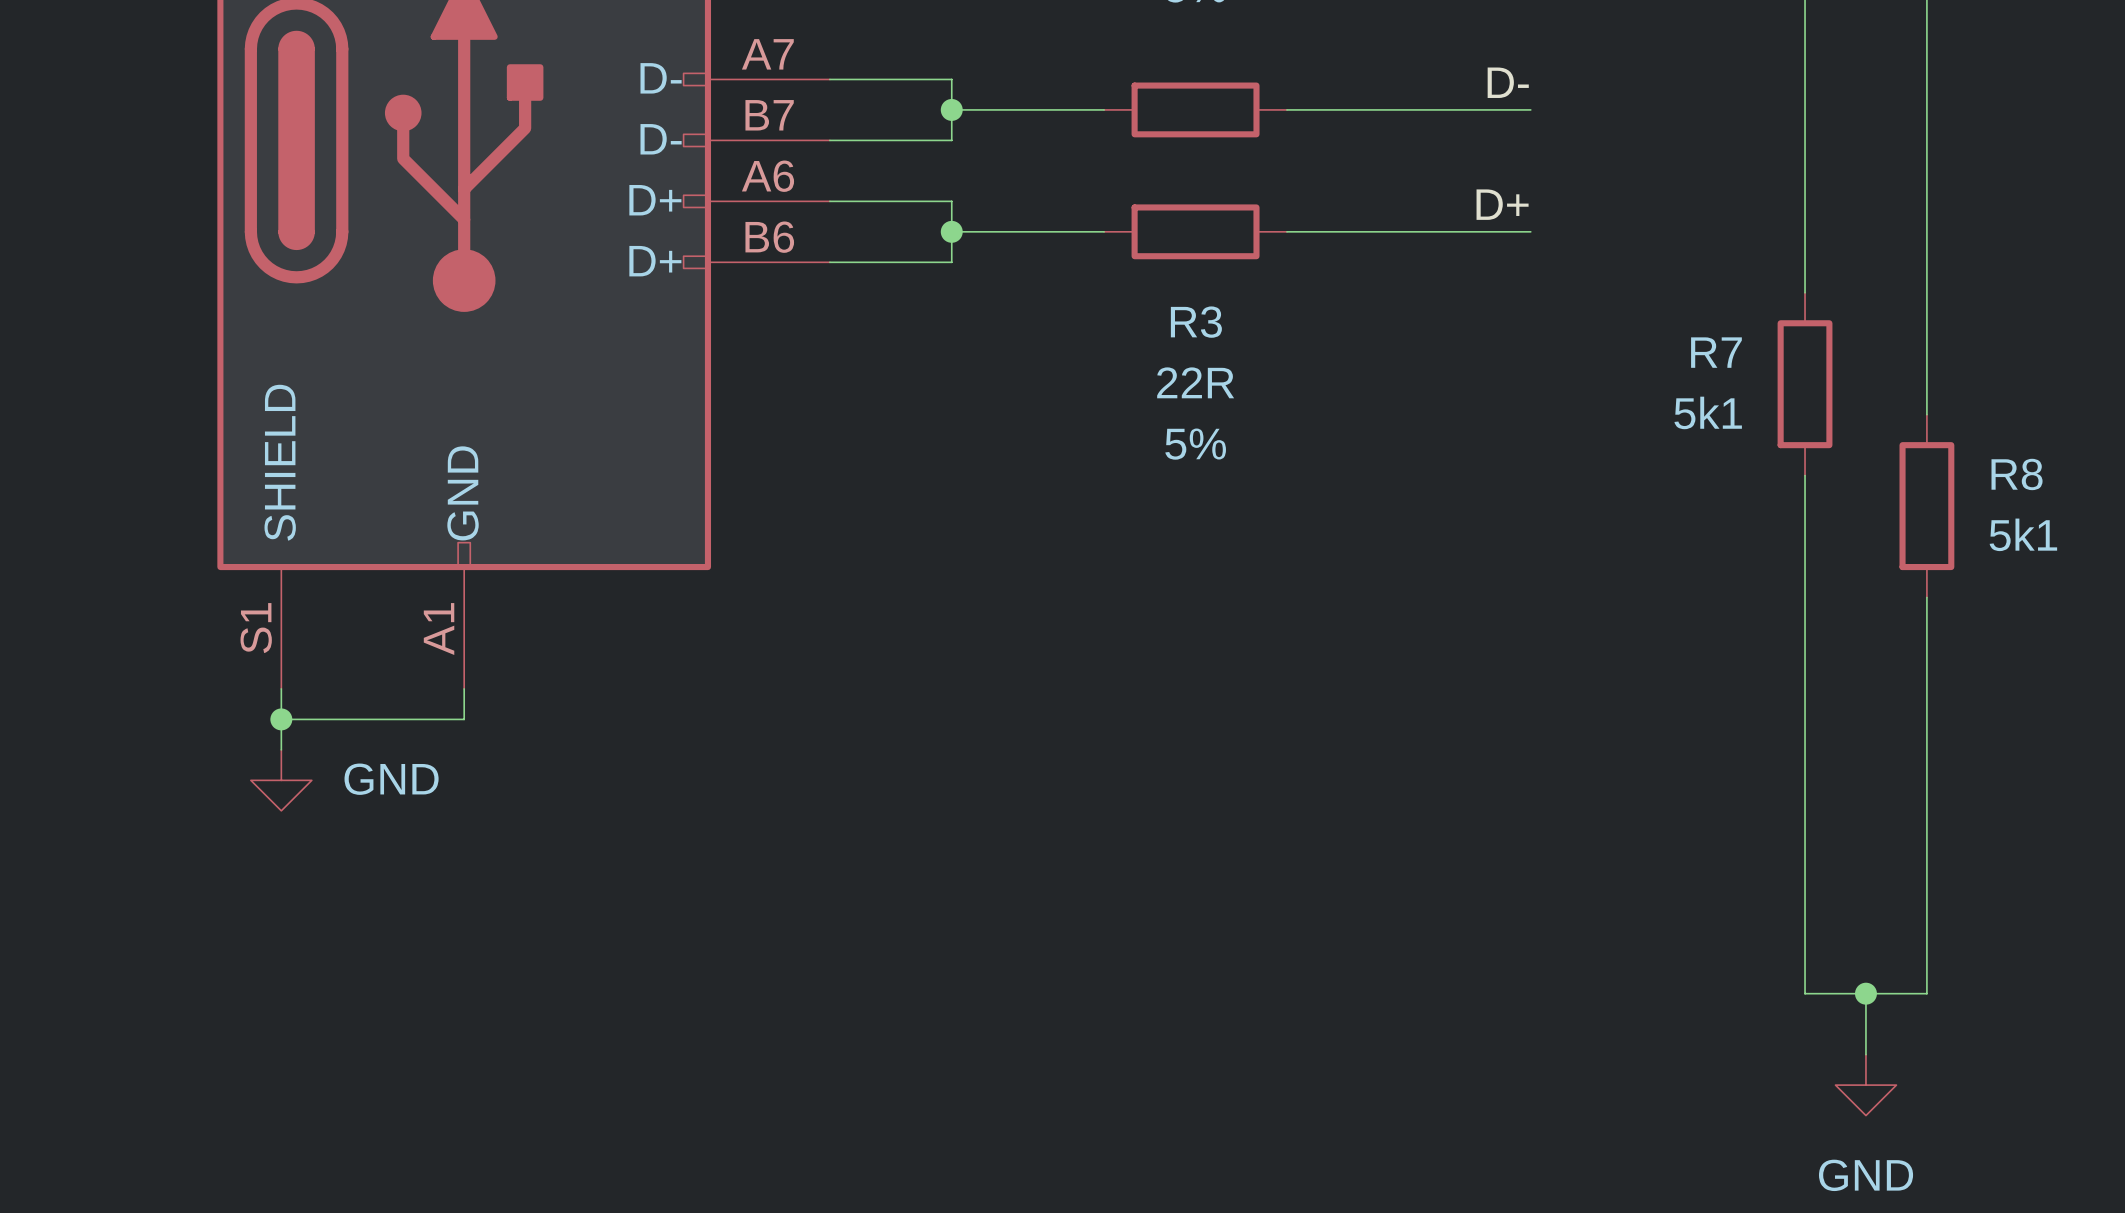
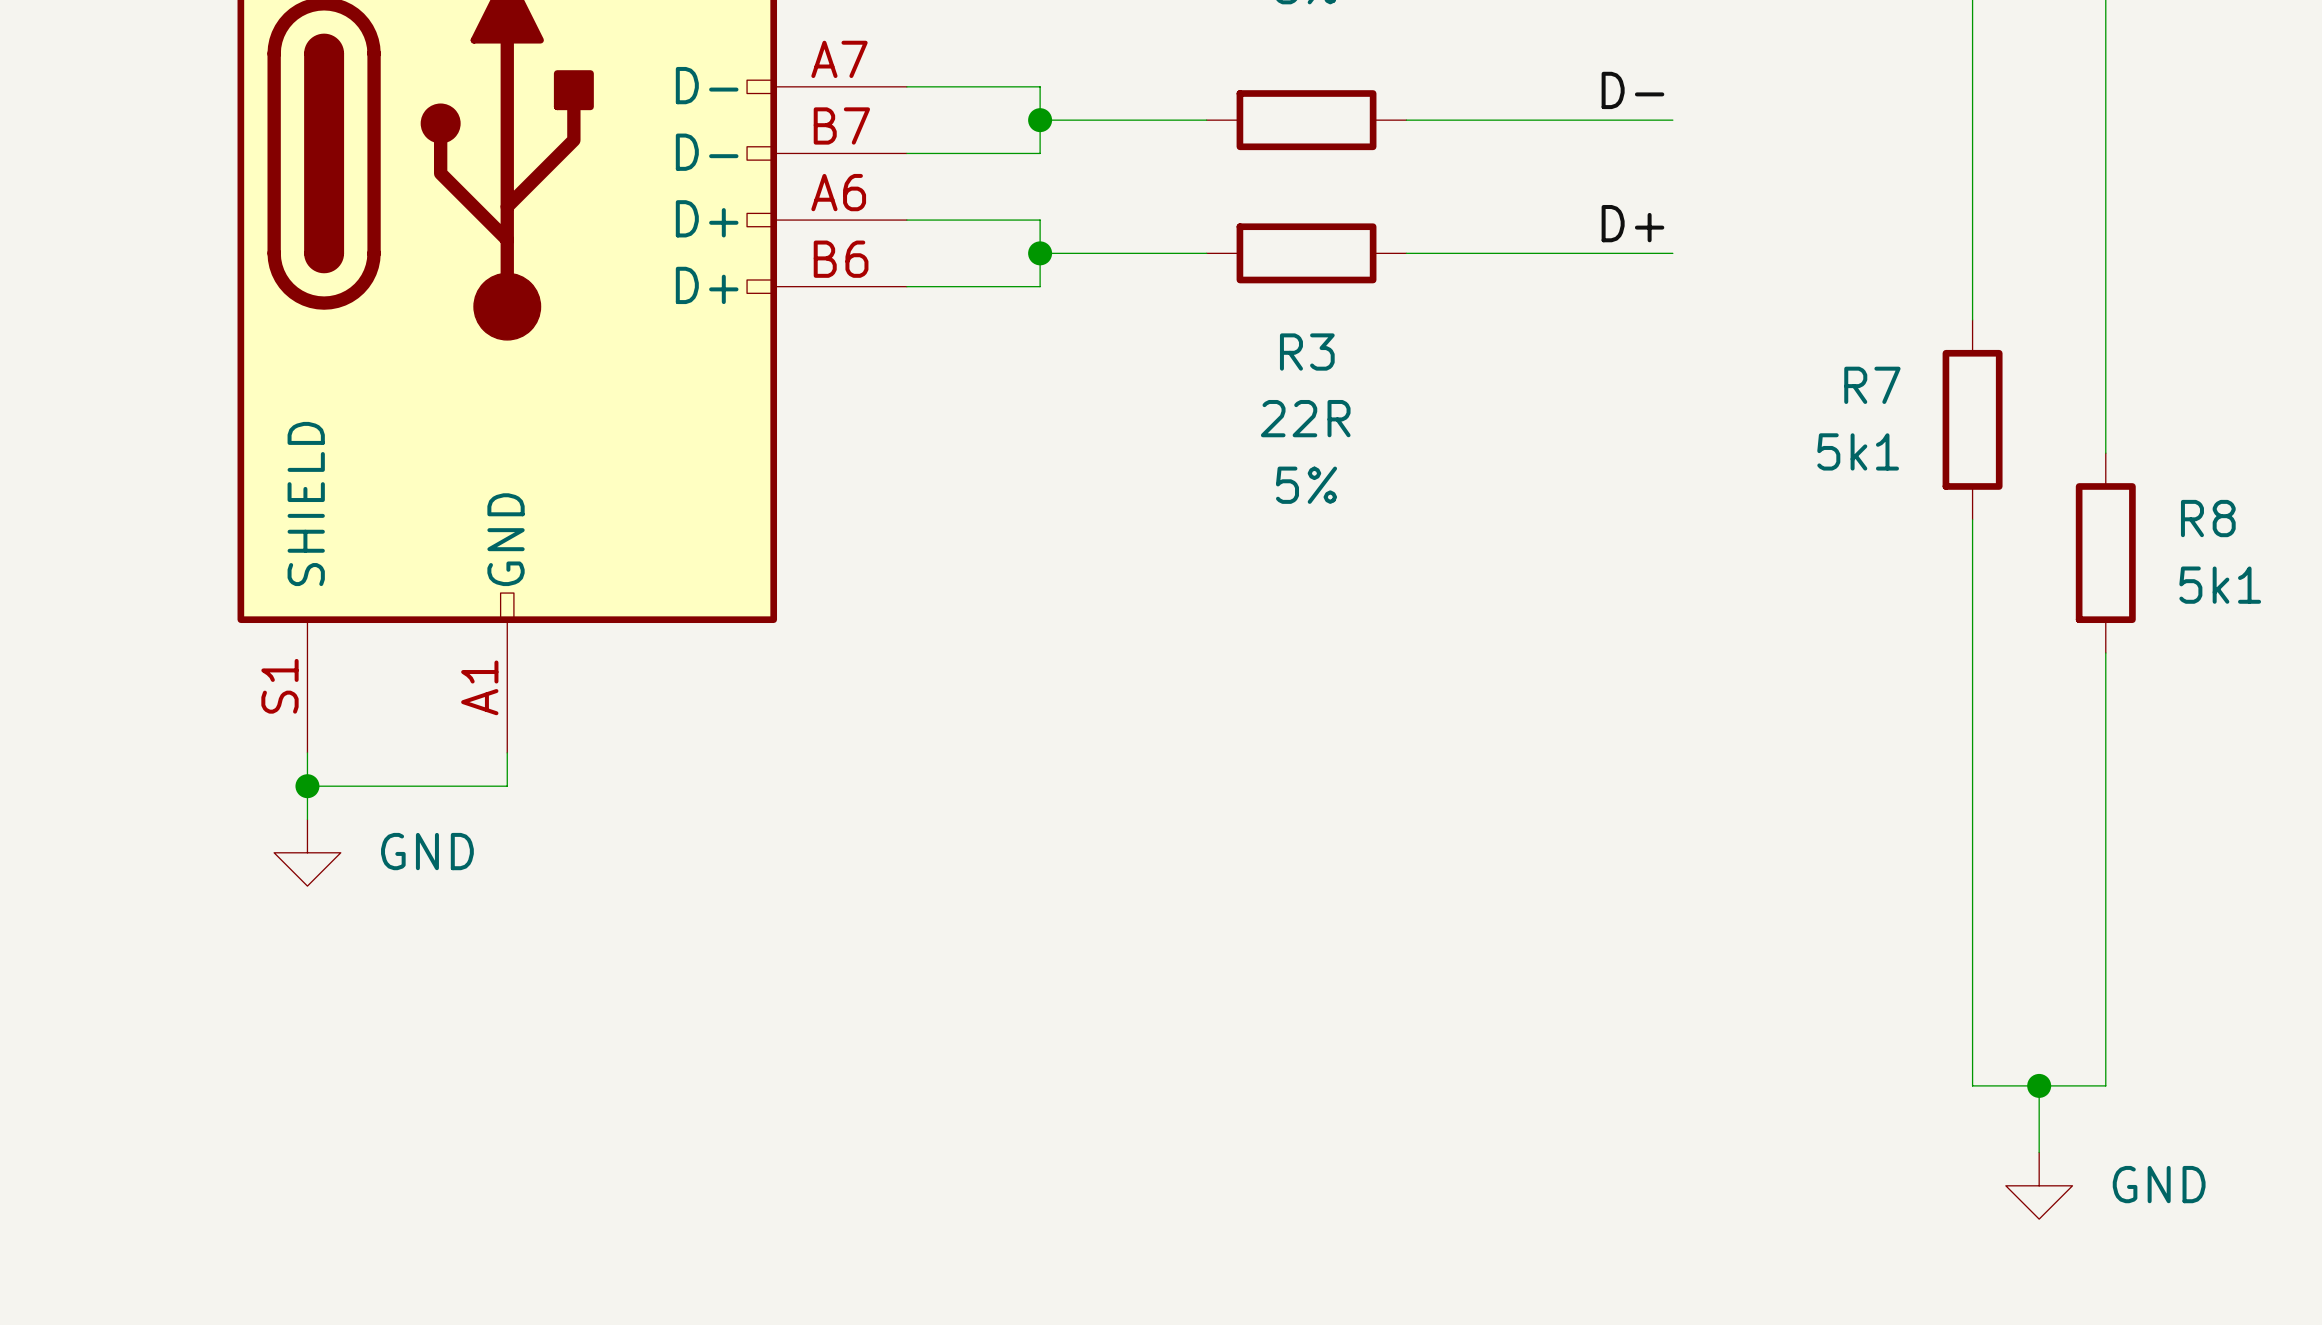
power symbol text position: GND (1866, 1175) -> GND (2159, 1184)

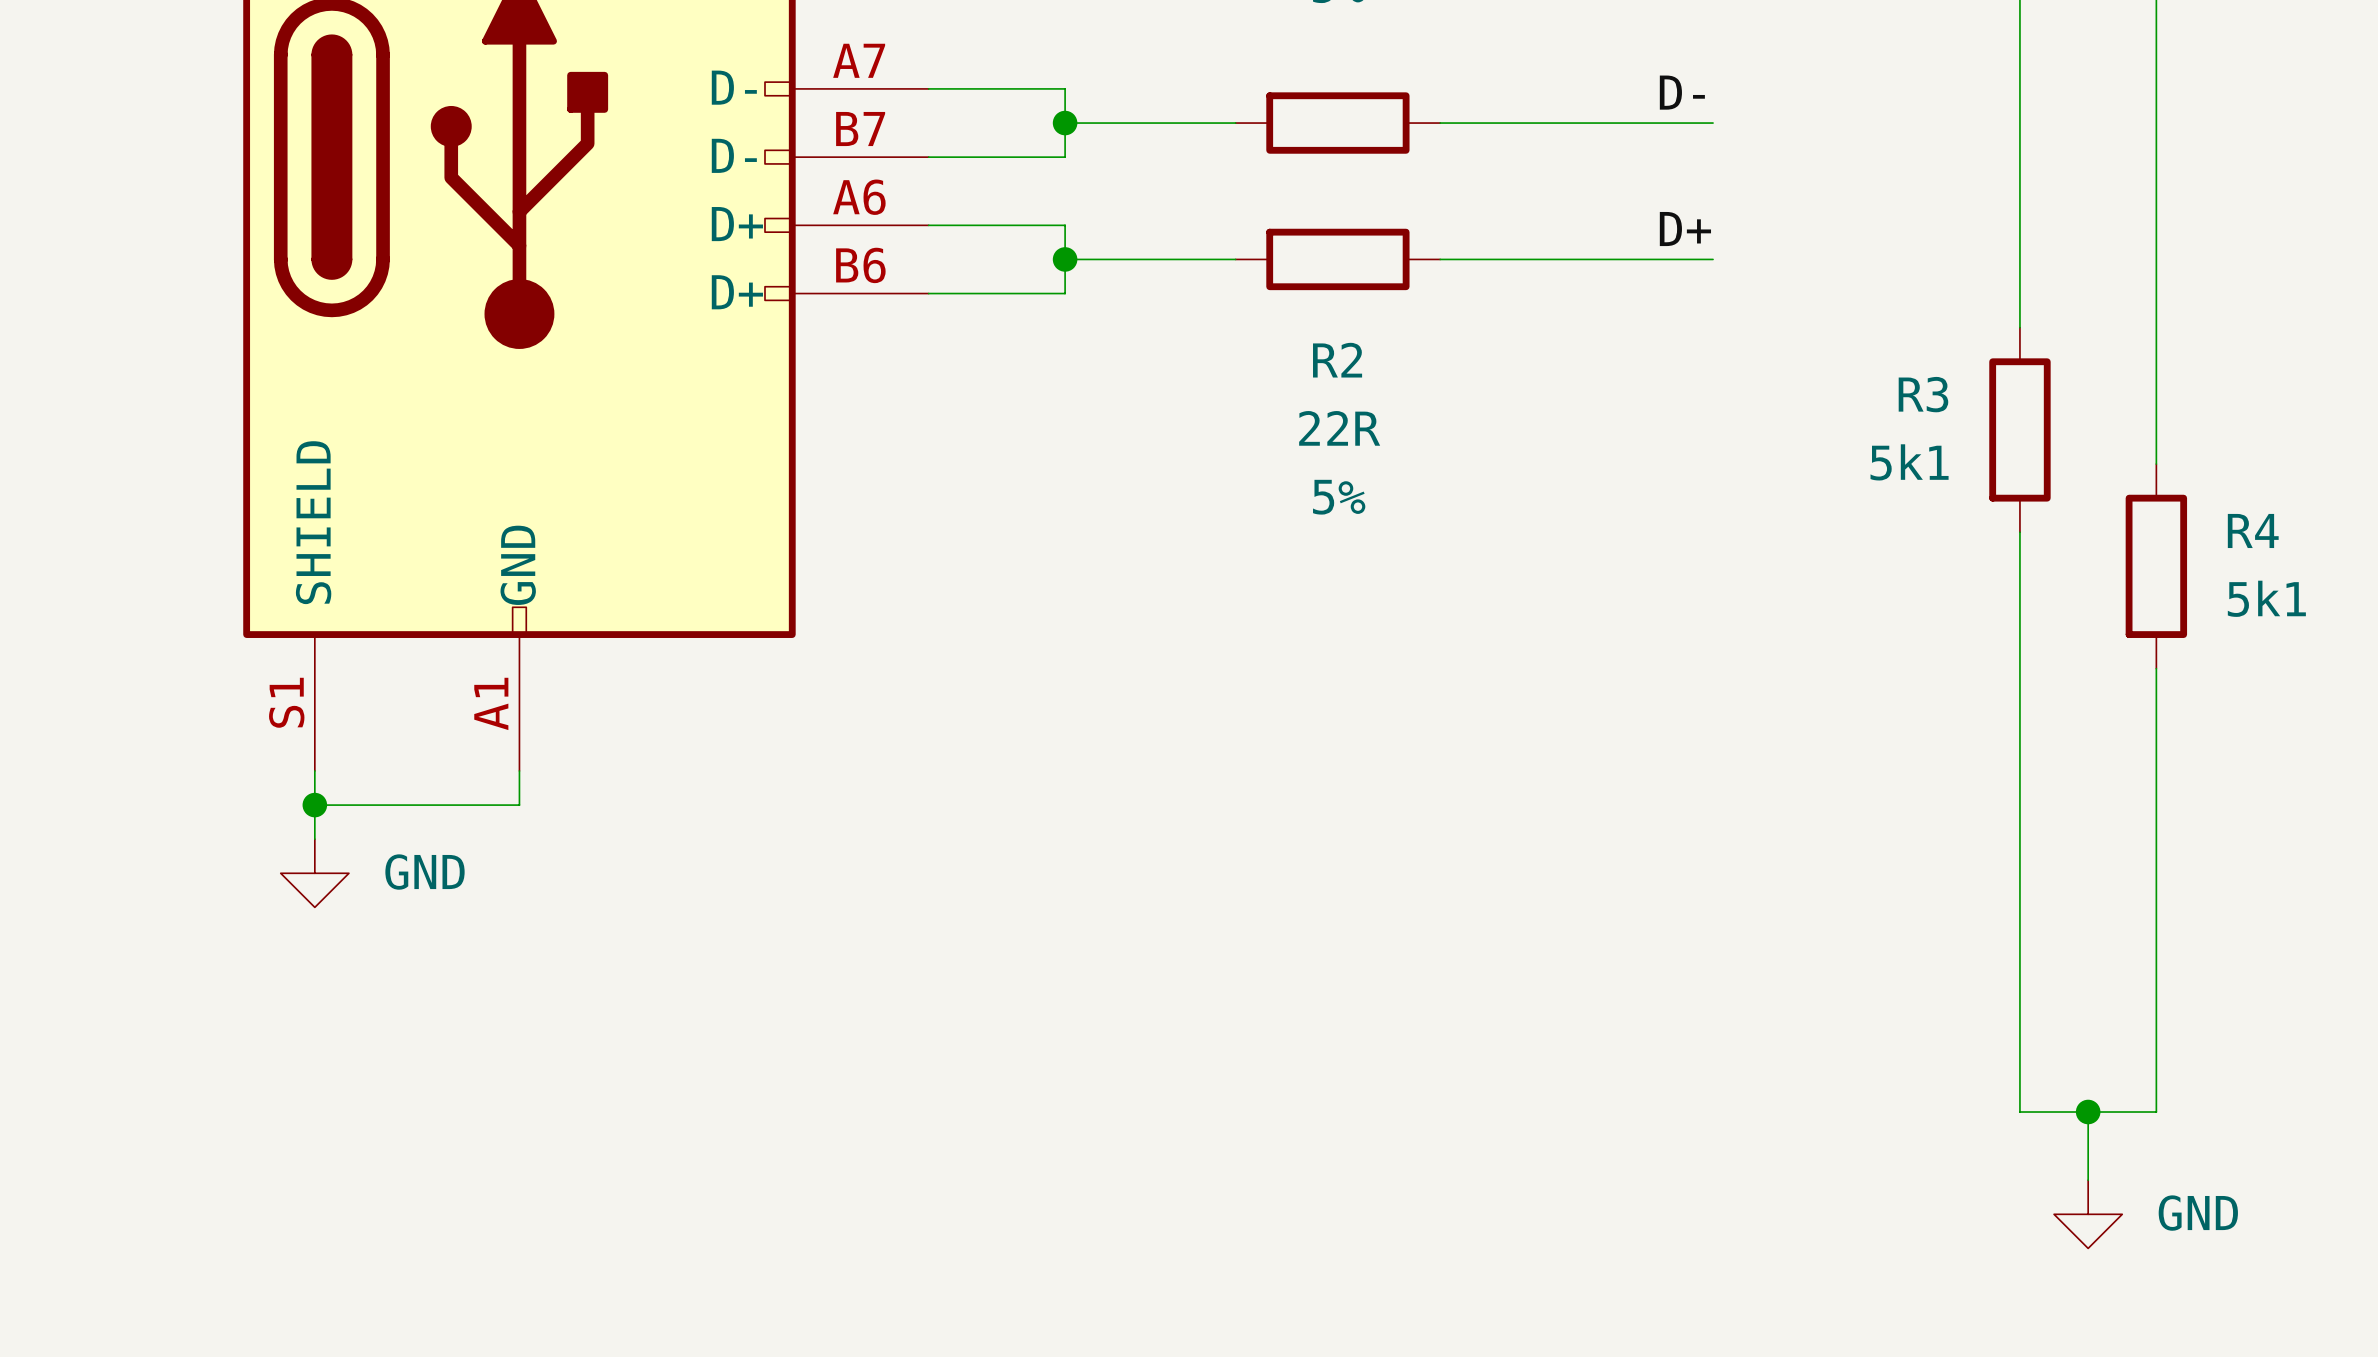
R3 name: R3 (1307, 352) -> R2 (1337, 360)
R7 name: R7 (1872, 385) -> R3 (1923, 394)
R8 name: R8 (2208, 518) -> R4 (2253, 530)

